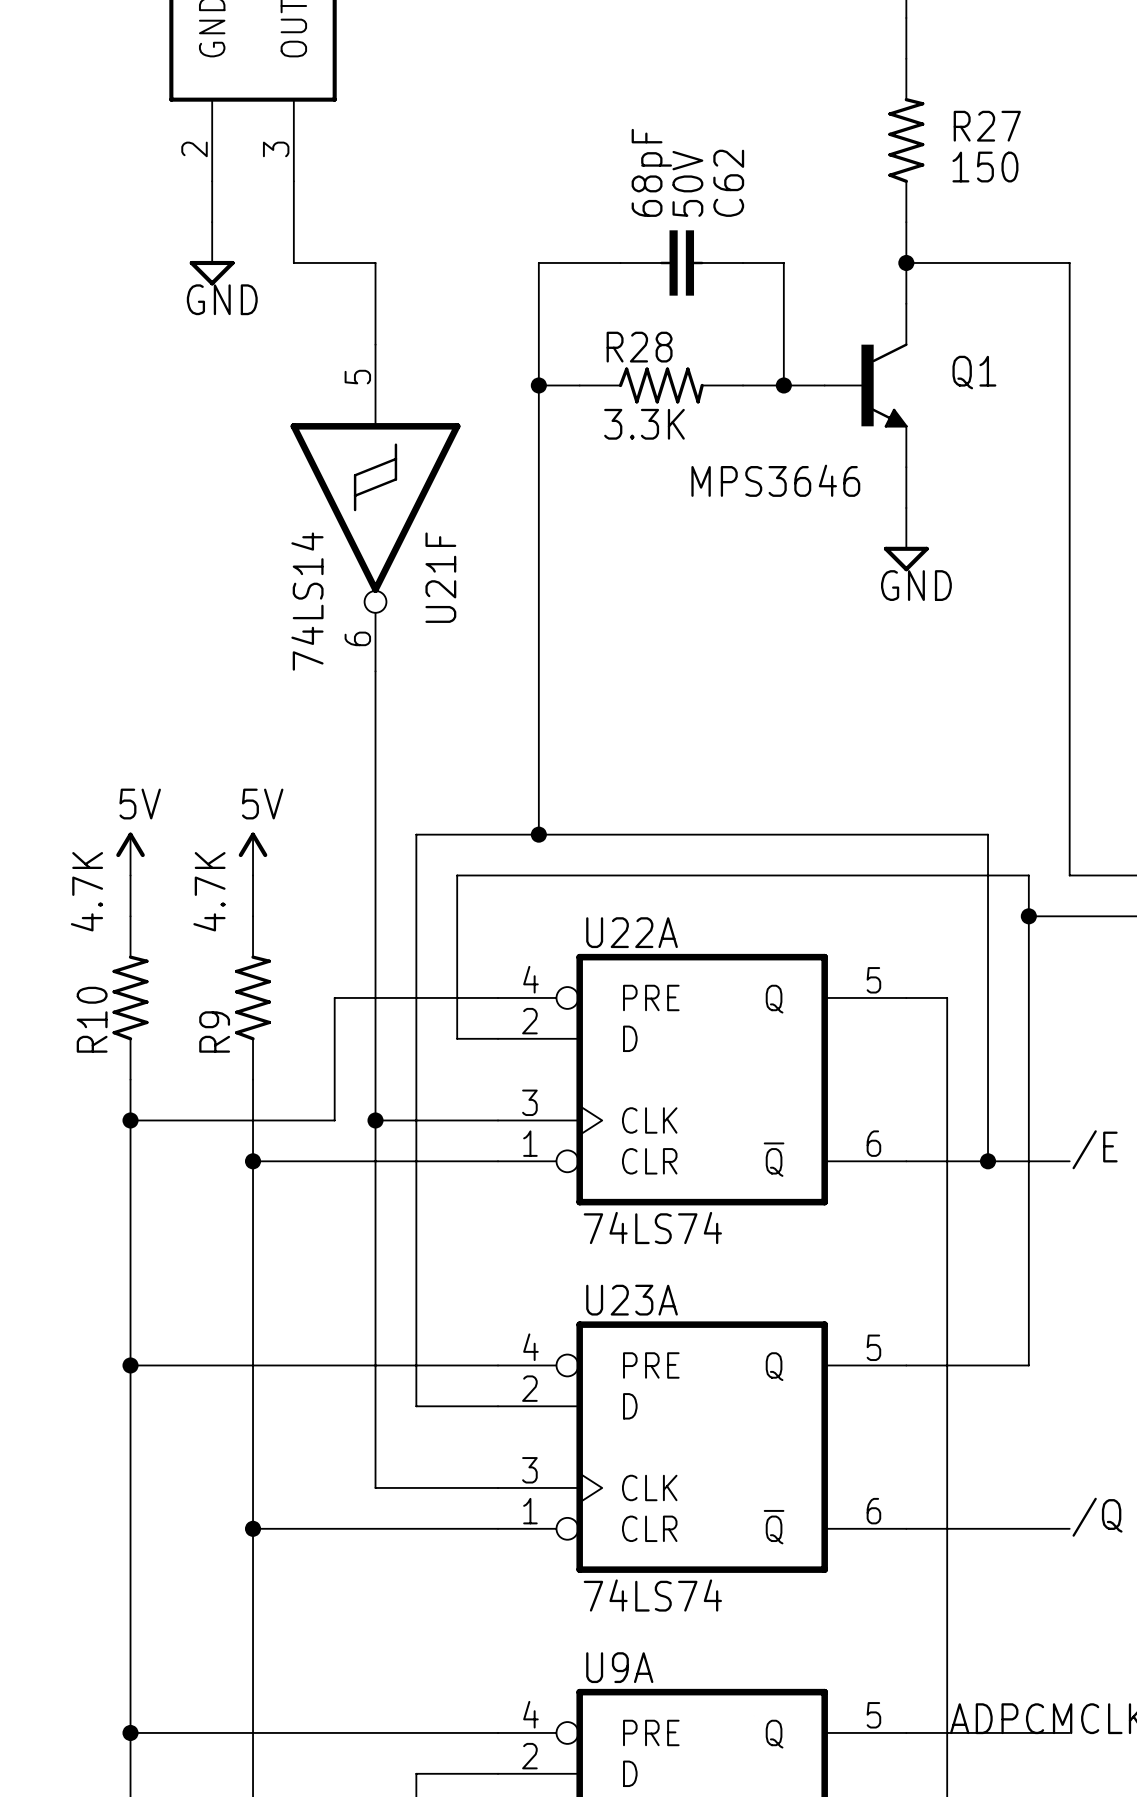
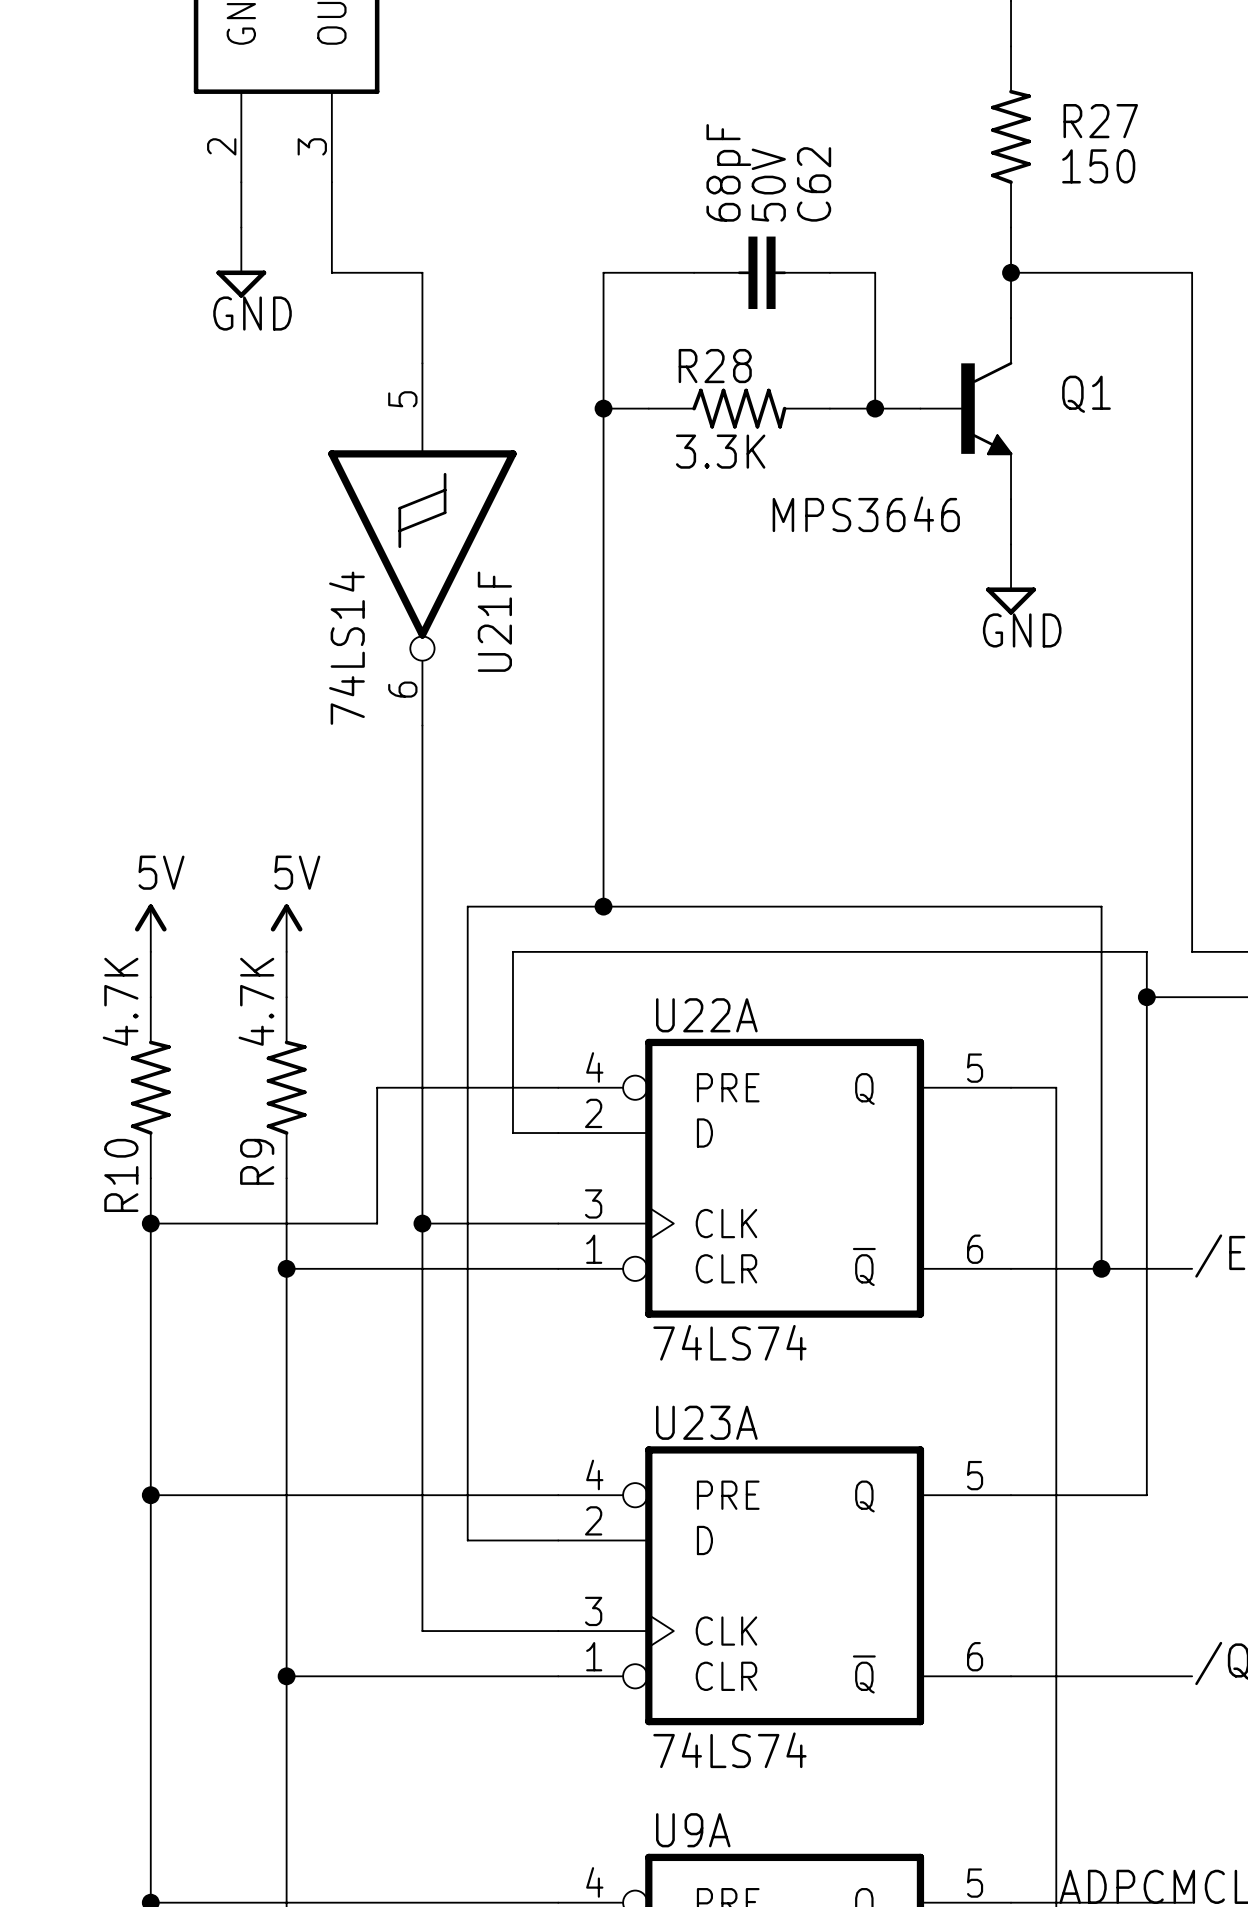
R10 value position: 4.7K (86, 891) -> 4.7K (120, 1001)
R9 value position: 4.7K (209, 891) -> 4.7K (256, 1001)
R10 name position: R10 (92, 1019) -> R10 (121, 1175)
R9 name position: R9 (214, 1032) -> R9 (257, 1161)

